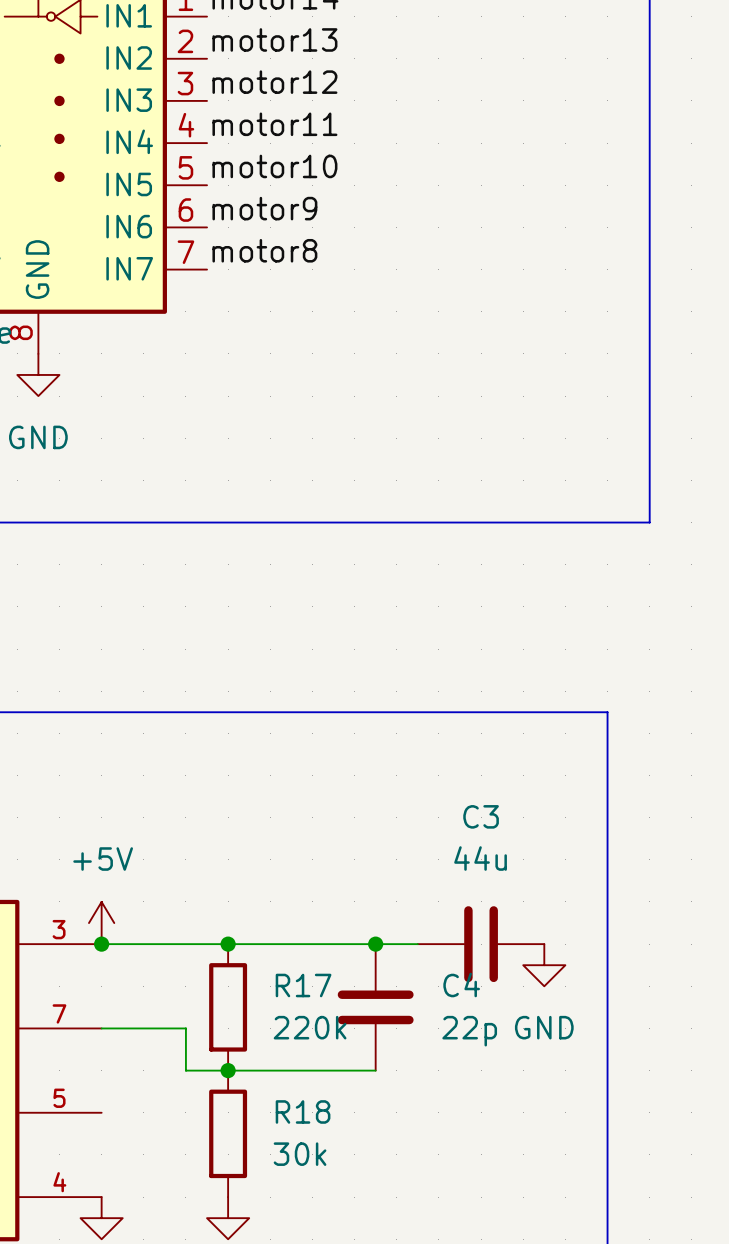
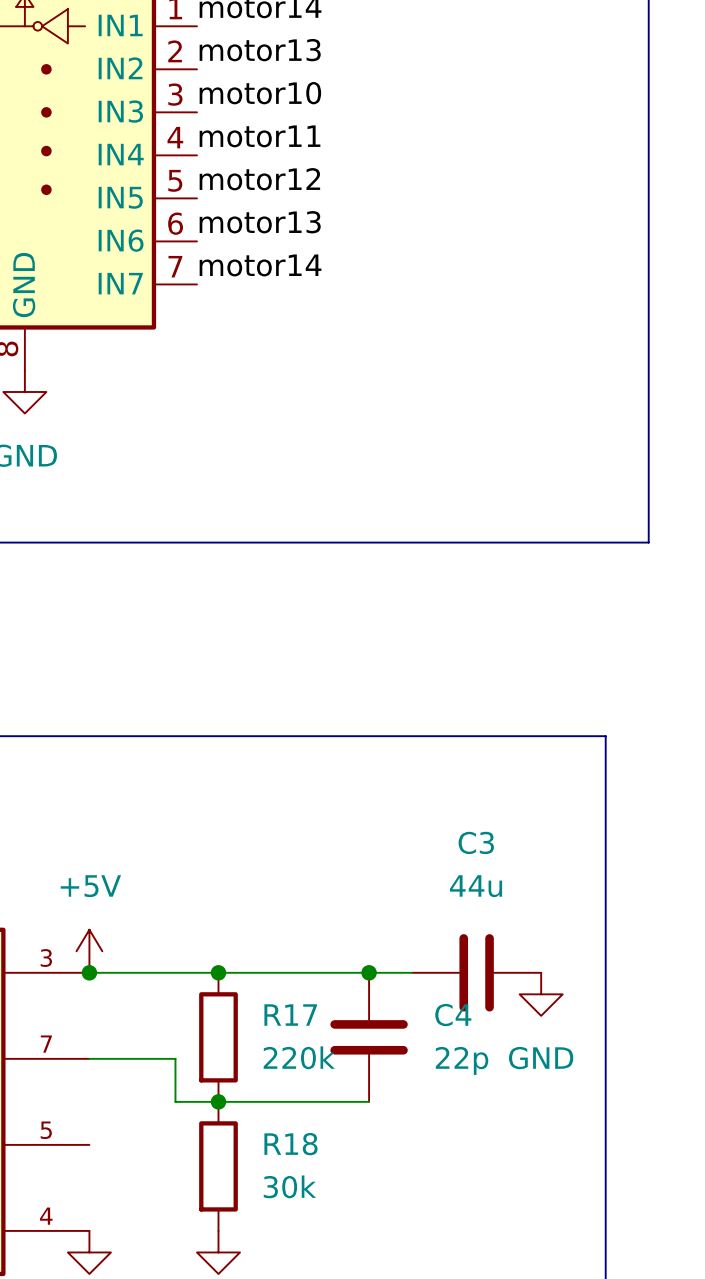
label: motor12 (274, 82) -> motor10 (260, 93)
label: motor10 (274, 166) -> motor12 (259, 179)
label: motor9 (264, 208) -> motor13 (260, 222)
label: motor8 (264, 250) -> motor14 (260, 265)

